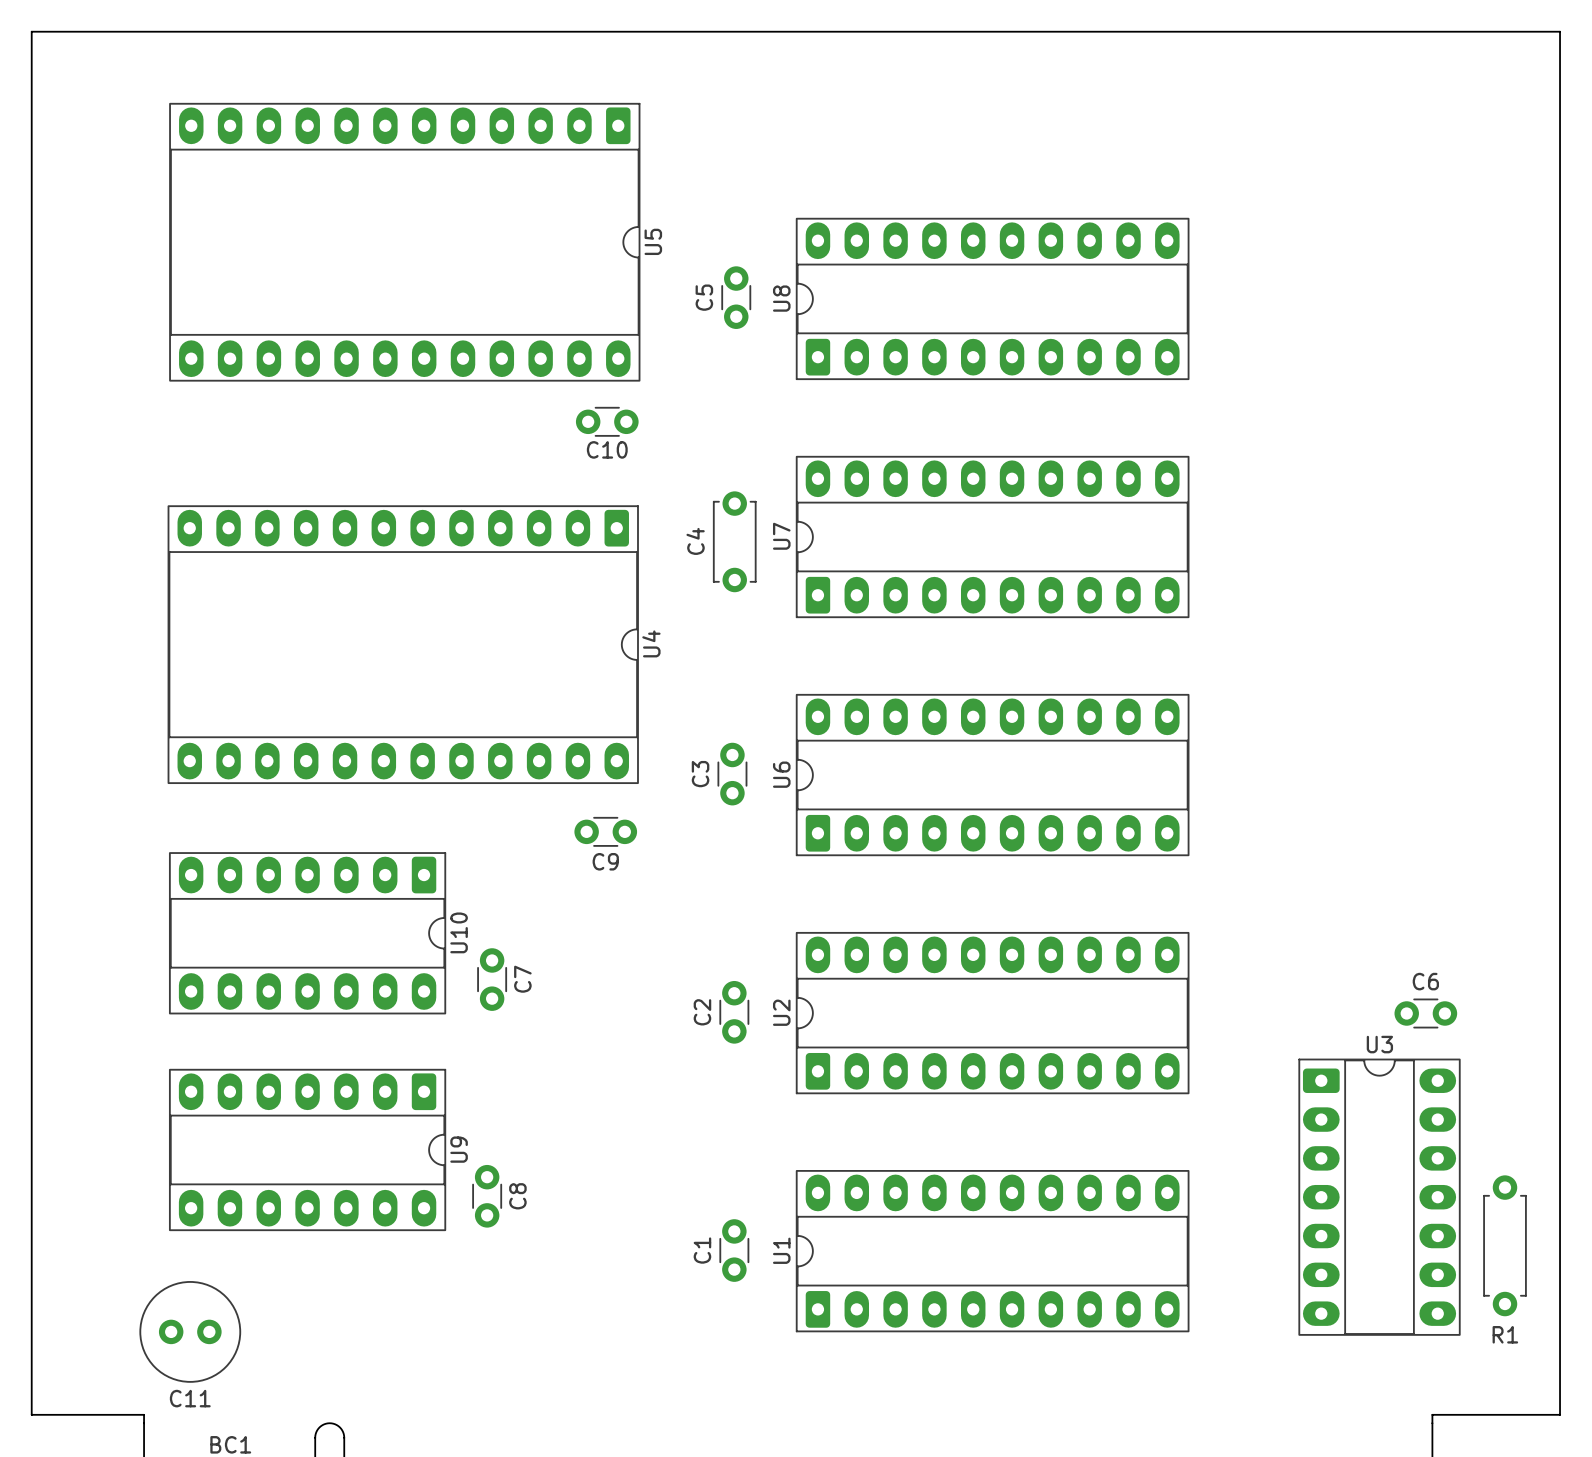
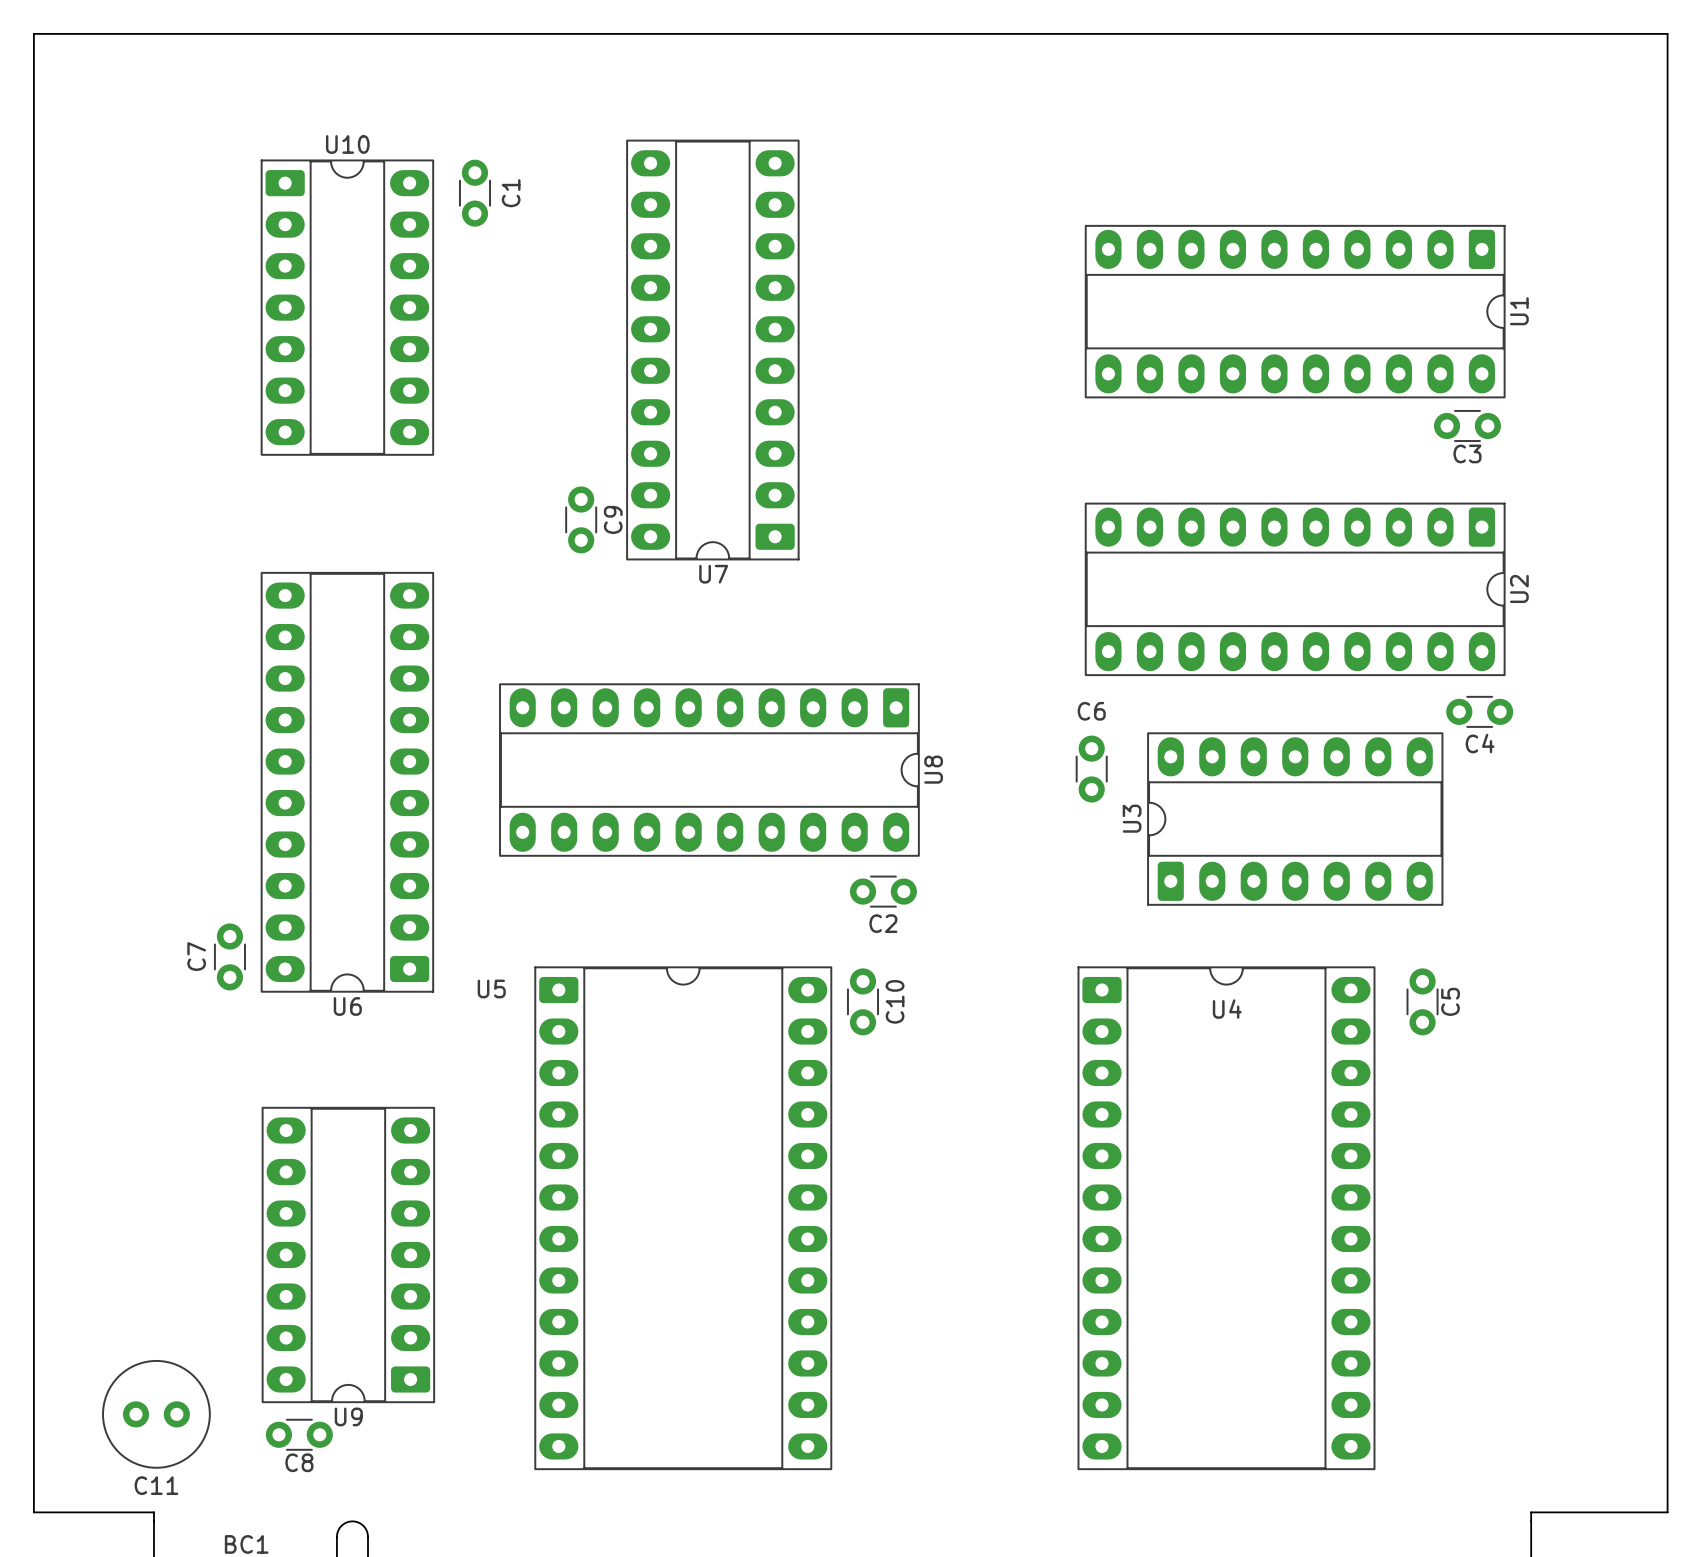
U5 name position: U5 (653, 241) -> U5 (491, 988)
U5 rotation: 0° (404, 242) -> 90° counterclockwise (683, 1218)
U5 position: (404, 242) -> (683, 1218)
C5 name position: C5 (704, 297) -> C5 (1450, 1001)
C5 position: (736, 297) -> (1422, 1001)
U8 rotation: 0° (992, 298) -> 180° (709, 770)
U8 position: (992, 298) -> (709, 770)
C10 rotation: 0° (607, 421) -> 90° clockwise (862, 1001)
C10 position: (607, 421) -> (862, 1001)
C10 name position: C10 (607, 449) -> C10 (895, 1001)
C4 footprint: [712, 491, 757, 593] -> [1446, 695, 1514, 728]
U7 rotation: 0° (992, 536) -> 90° counterclockwise (712, 350)
U7 position: (992, 536) -> (712, 350)
C4 name position: C4 (695, 541) -> C4 (1480, 743)
U4 name position: U4 (651, 643) -> U4 (1227, 1009)
U4 rotation: 0° (403, 644) -> 90° counterclockwise (1226, 1218)
U4 position: (403, 644) -> (1226, 1218)
U6 footprint: [795, 693, 1190, 857] -> [260, 571, 435, 993]
C3 name position: C3 (700, 774) -> C3 (1467, 453)
C3 rotation: 0° (732, 774) -> 90° clockwise (1467, 425)
C3 position: (732, 774) -> (1467, 425)
U6 name position: U6 (781, 774) -> U6 (347, 1006)
C9 rotation: 0° (605, 831) -> 90° clockwise (581, 519)
C9 position: (605, 831) -> (581, 519)
C9 name position: C9 (605, 861) -> C9 (613, 519)
U10 rotation: 0° (307, 933) -> 90° counterclockwise (347, 307)
U10 position: (307, 933) -> (347, 307)
C7 position: (492, 979) -> (229, 956)
C7 name position: C7 (522, 979) -> C7 (196, 956)
C2 name position: C2 (702, 1012) -> C2 (883, 923)
C2 rotation: 0° (734, 1012) -> 90° clockwise (883, 891)
C2 position: (734, 1012) -> (883, 891)
U2 rotation: 0° (992, 1013) -> 180° (1295, 589)
U2 position: (992, 1013) -> (1295, 589)
C6 rotation: 0° (1425, 1013) -> 90° clockwise (1091, 769)
C6 position: (1425, 1013) -> (1091, 769)
U9 rotation: 0° (307, 1149) -> 90° clockwise (348, 1254)
C8 rotation: 0° (487, 1196) -> 90° clockwise (299, 1434)
C8 position: (487, 1196) -> (299, 1434)
U3 rotation: 0° (1379, 1197) -> 90° counterclockwise (1295, 819)
U3 position: (1379, 1197) -> (1295, 819)
R1: (1505, 1245) -> none
C1 name position: C1 (702, 1250) -> C1 (511, 193)
C1 position: (734, 1250) -> (474, 193)
U1 rotation: 0° (992, 1251) -> 180° (1295, 311)
U1 position: (992, 1251) -> (1295, 311)
C11 position: (190, 1331) -> (156, 1414)

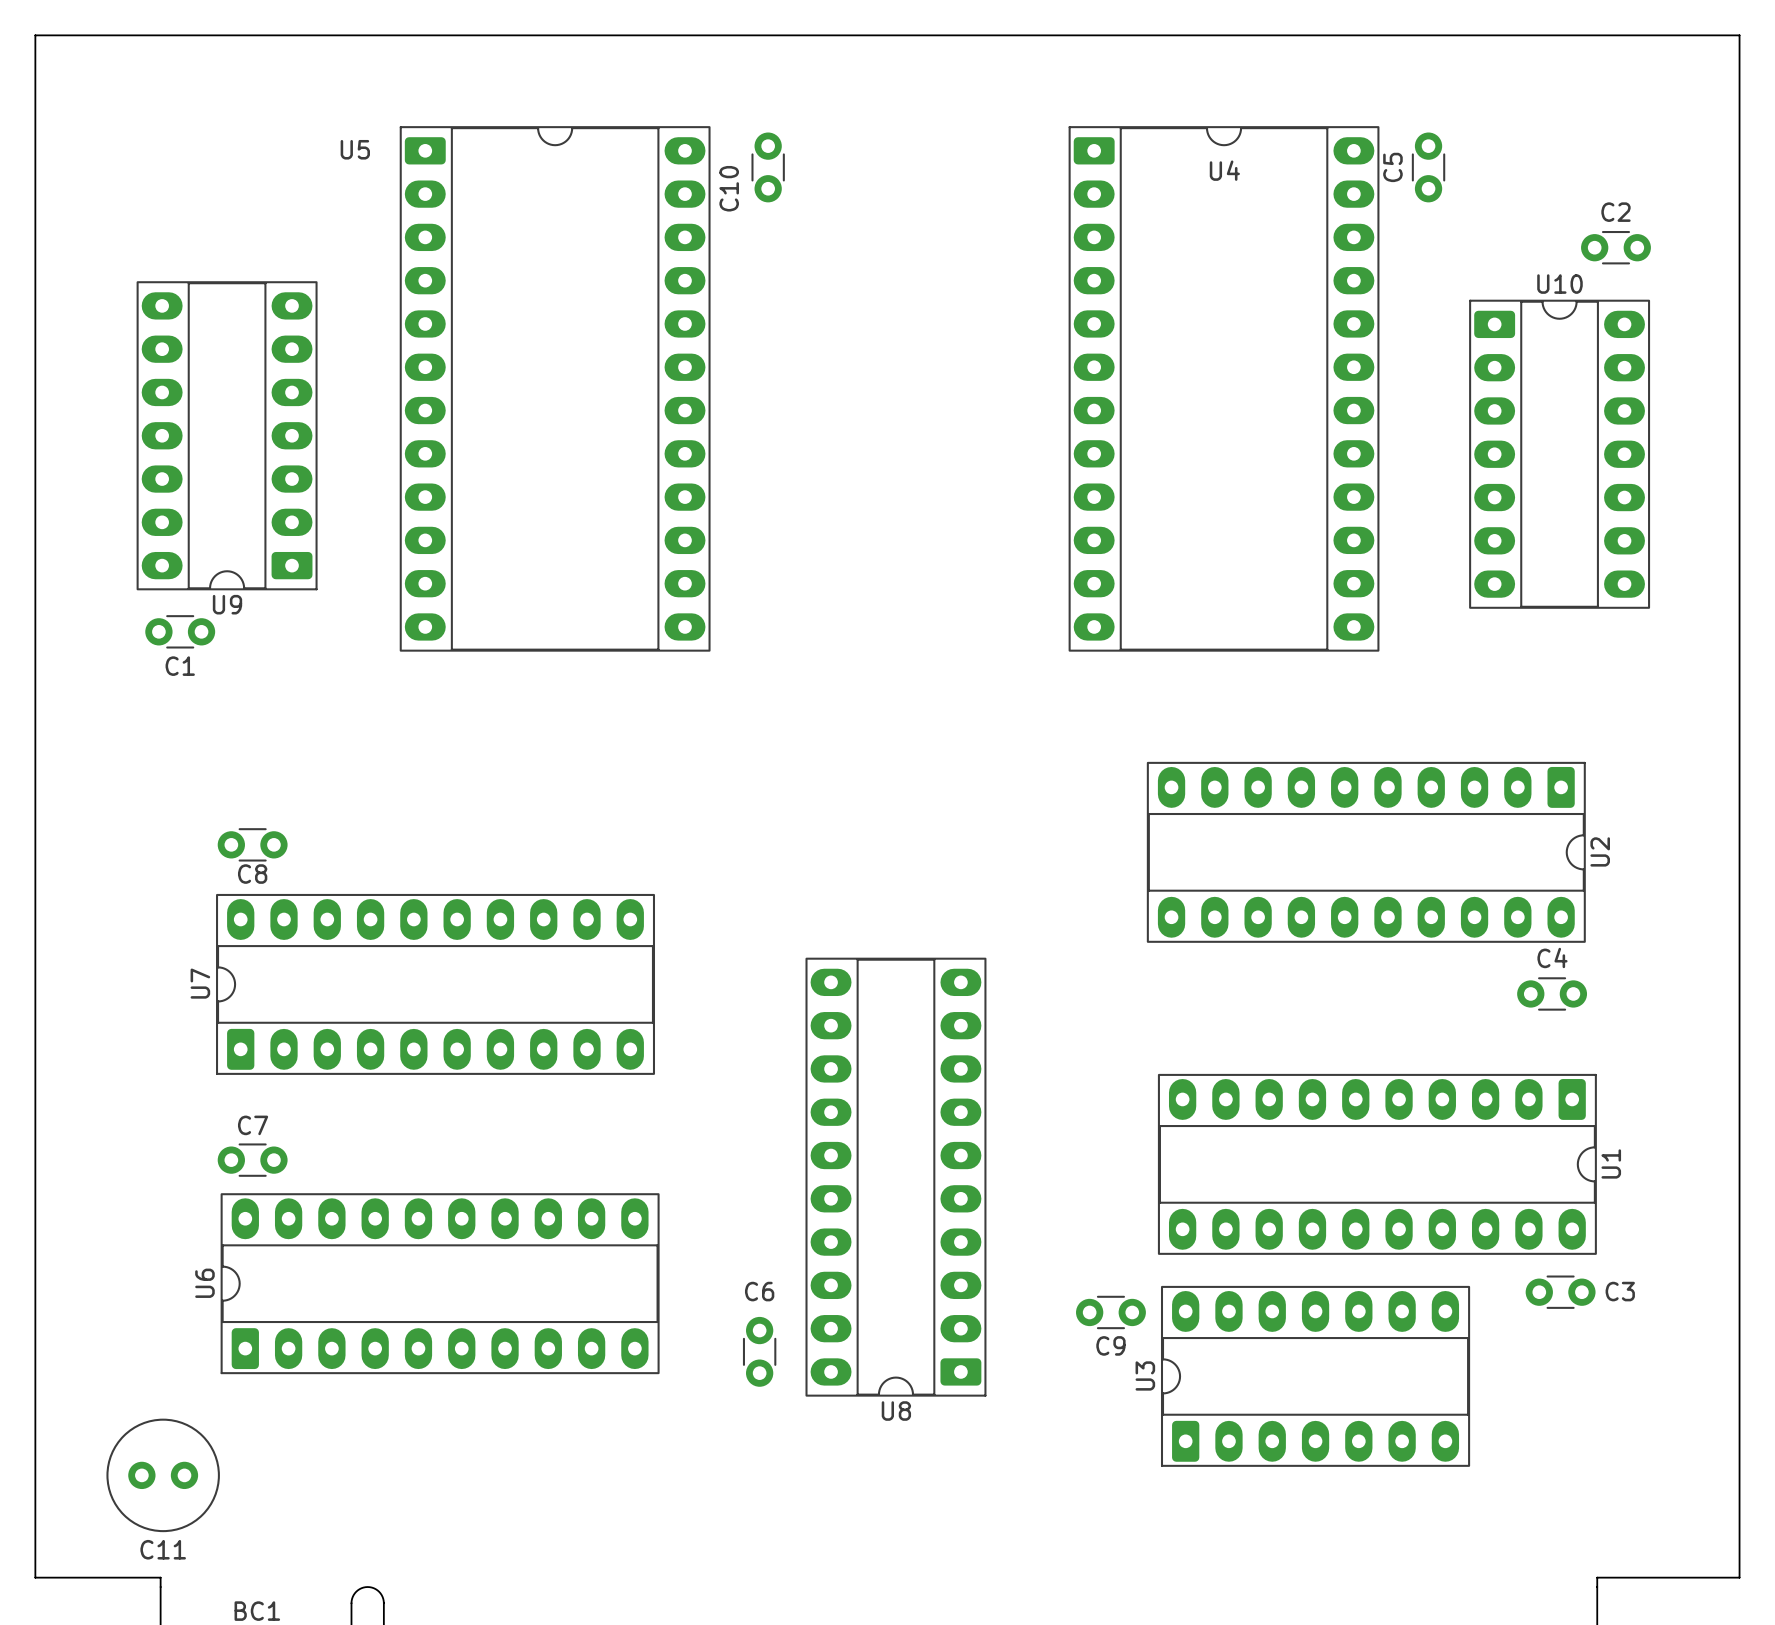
C1 rotation: 0° (474, 193) -> 90° clockwise (180, 631)
C1 position: (474, 193) -> (180, 631)
U10 position: (347, 307) -> (1559, 454)
U1 position: (1295, 311) -> (1377, 1164)
U7 rotation: 0° (712, 350) -> 90° clockwise (435, 984)
U7 position: (712, 350) -> (435, 984)
C3 position: (1467, 425) -> (1560, 1292)
C3 name position: C3 (1467, 453) -> C3 (1620, 1291)
C9 rotation: 0° (581, 519) -> 90° clockwise (1110, 1312)
C9 position: (581, 519) -> (1110, 1312)
U2 position: (1295, 589) -> (1366, 852)
C4 position: (1479, 711) -> (1552, 993)
C4 name position: C4 (1480, 743) -> C4 (1552, 957)
C6 position: (1091, 769) -> (759, 1351)
U8 rotation: 0° (709, 770) -> 90° clockwise (895, 1177)
U8 position: (709, 770) -> (895, 1177)
U6 rotation: 0° (347, 782) -> 90° clockwise (440, 1283)
U6 position: (347, 782) -> (440, 1283)
U3 position: (1295, 819) -> (1315, 1376)
C2 position: (883, 891) -> (1615, 247)
C2 name position: C2 (883, 923) -> C2 (1615, 212)
C7 rotation: 0° (229, 956) -> 90° clockwise (252, 1160)
C7 position: (229, 956) -> (252, 1160)
C10 position: (862, 1001) -> (768, 167)
C10 name position: C10 (895, 1001) -> C10 (729, 188)
C5 position: (1422, 1001) -> (1428, 167)
C5 name position: C5 (1450, 1001) -> C5 (1392, 167)
U5 position: (683, 1218) -> (555, 388)
U4 position: (1226, 1218) -> (1224, 388)
U9 position: (348, 1254) -> (227, 435)
C8 position: (299, 1434) -> (252, 844)

